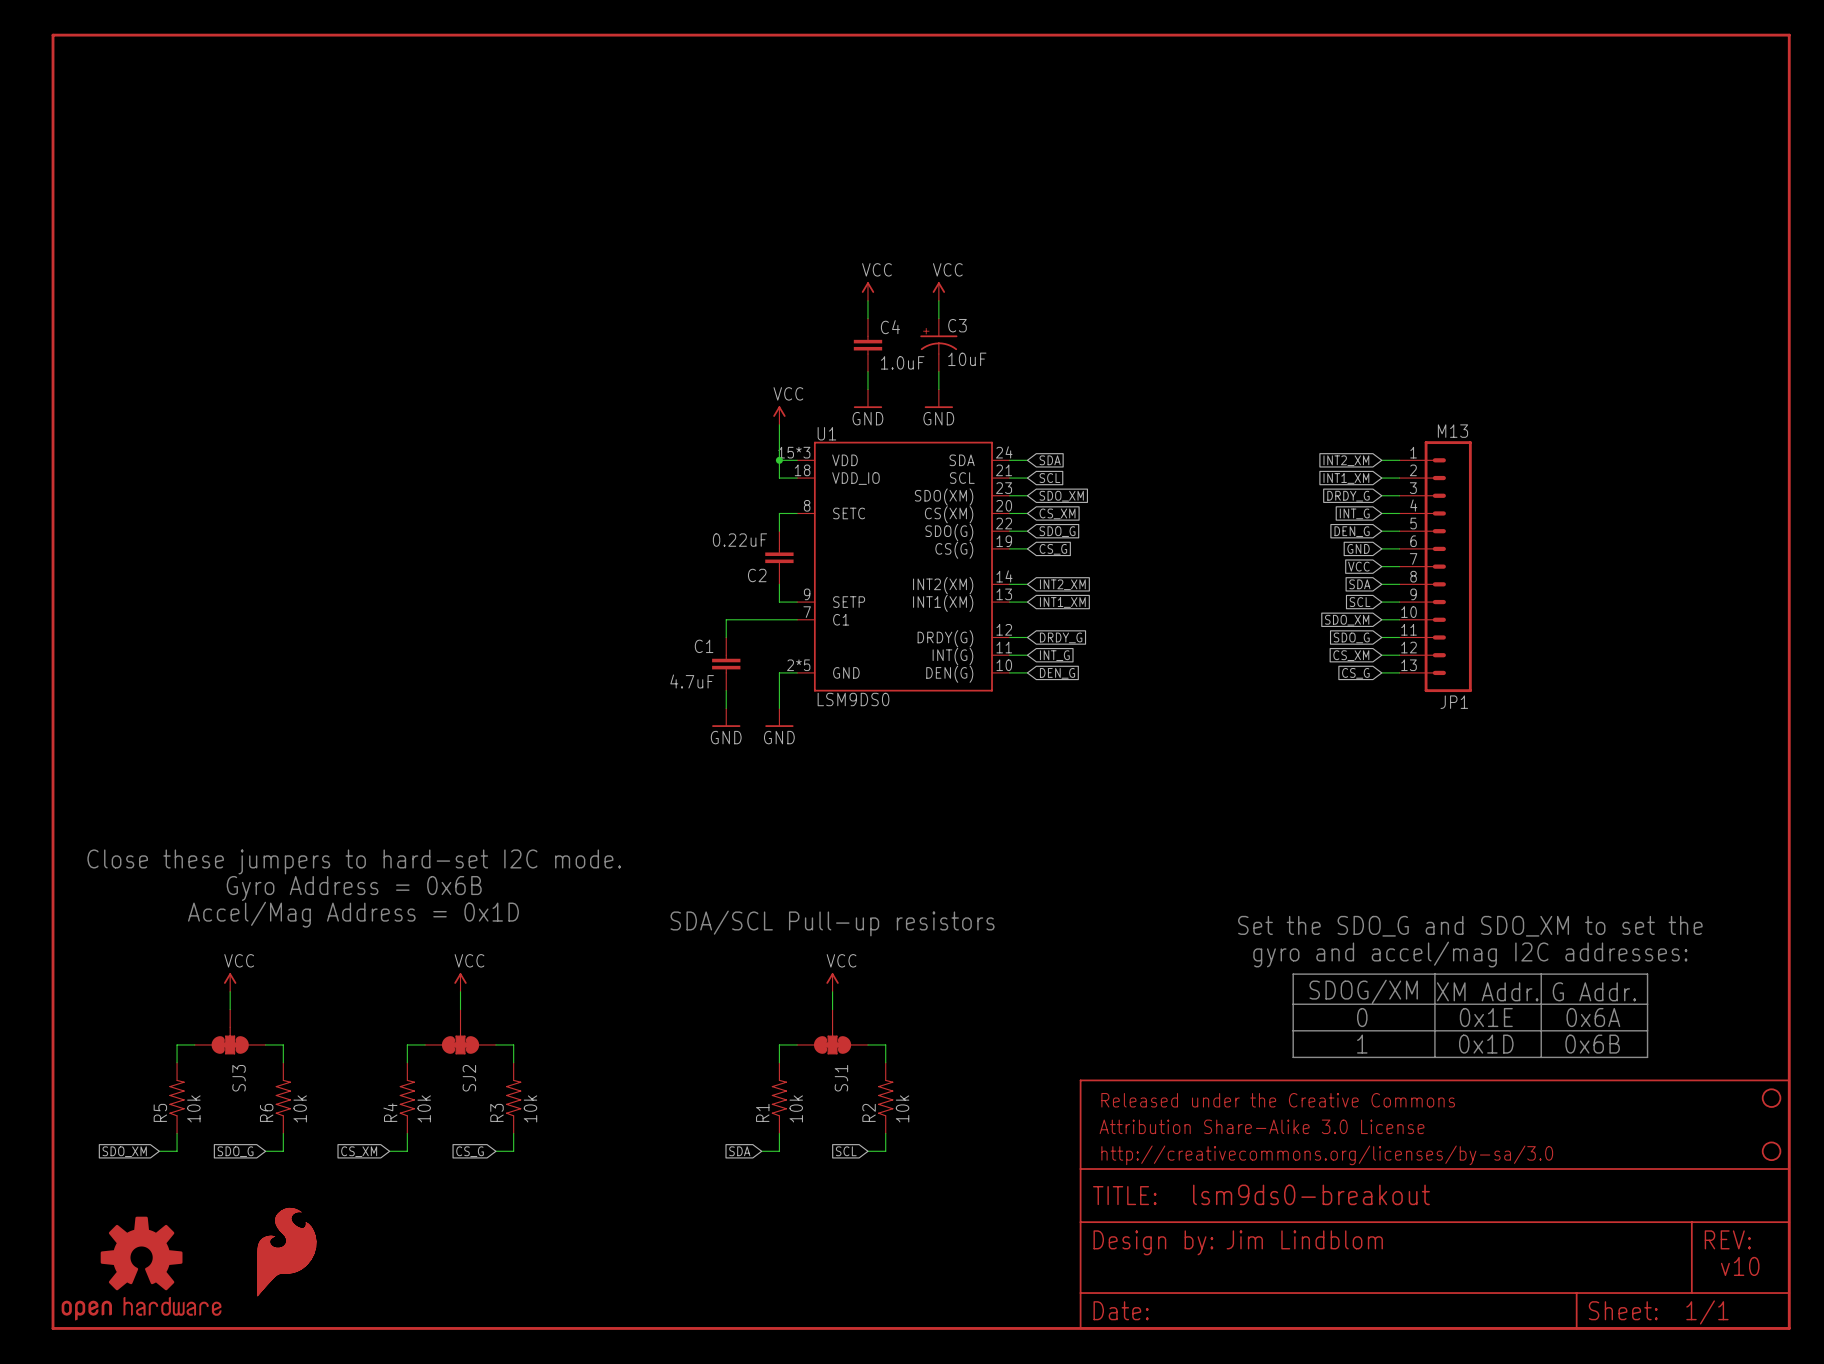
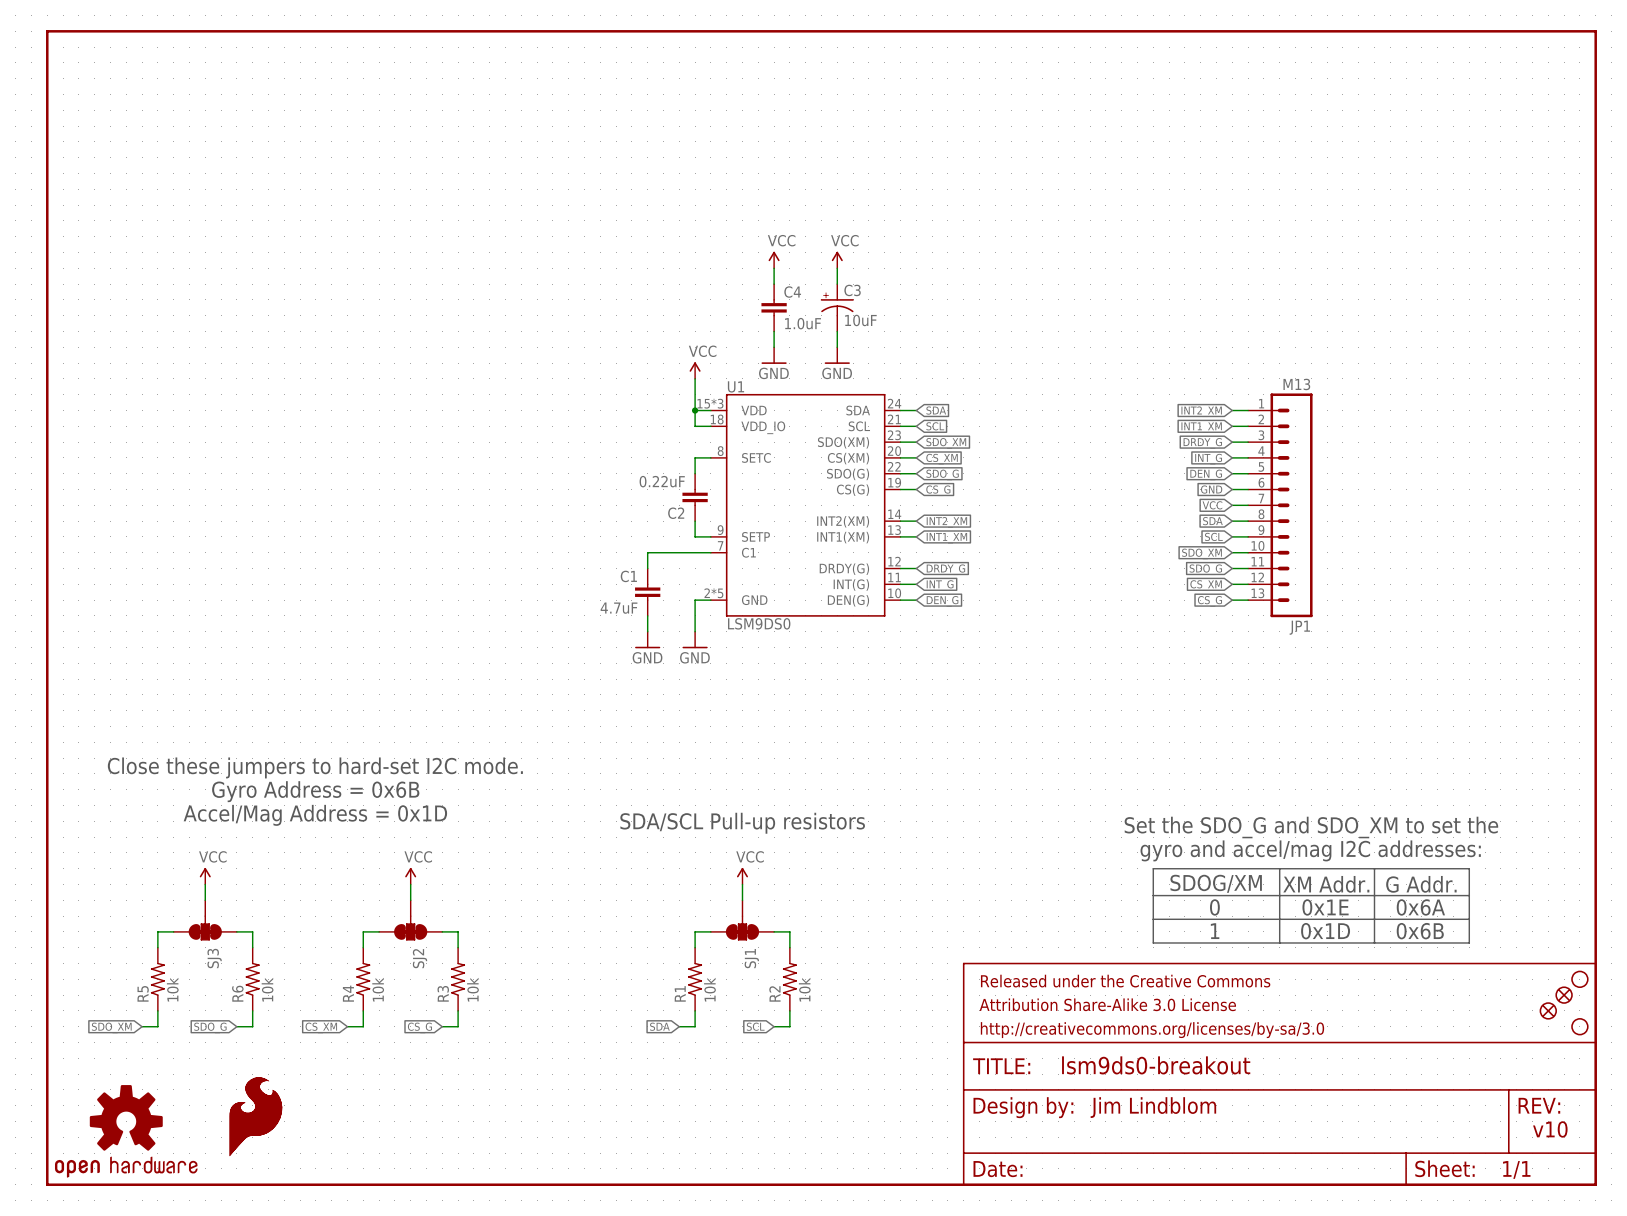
part: none -> (1564, 995)
part: none -> (1548, 1010)

